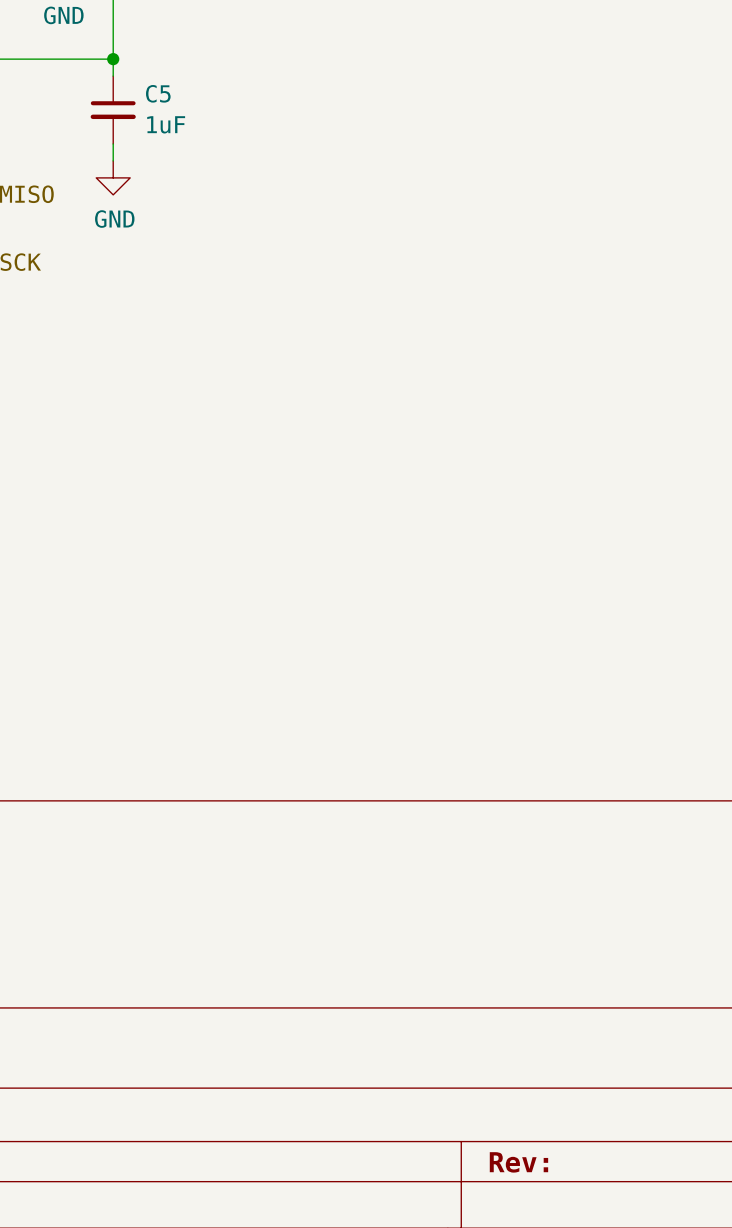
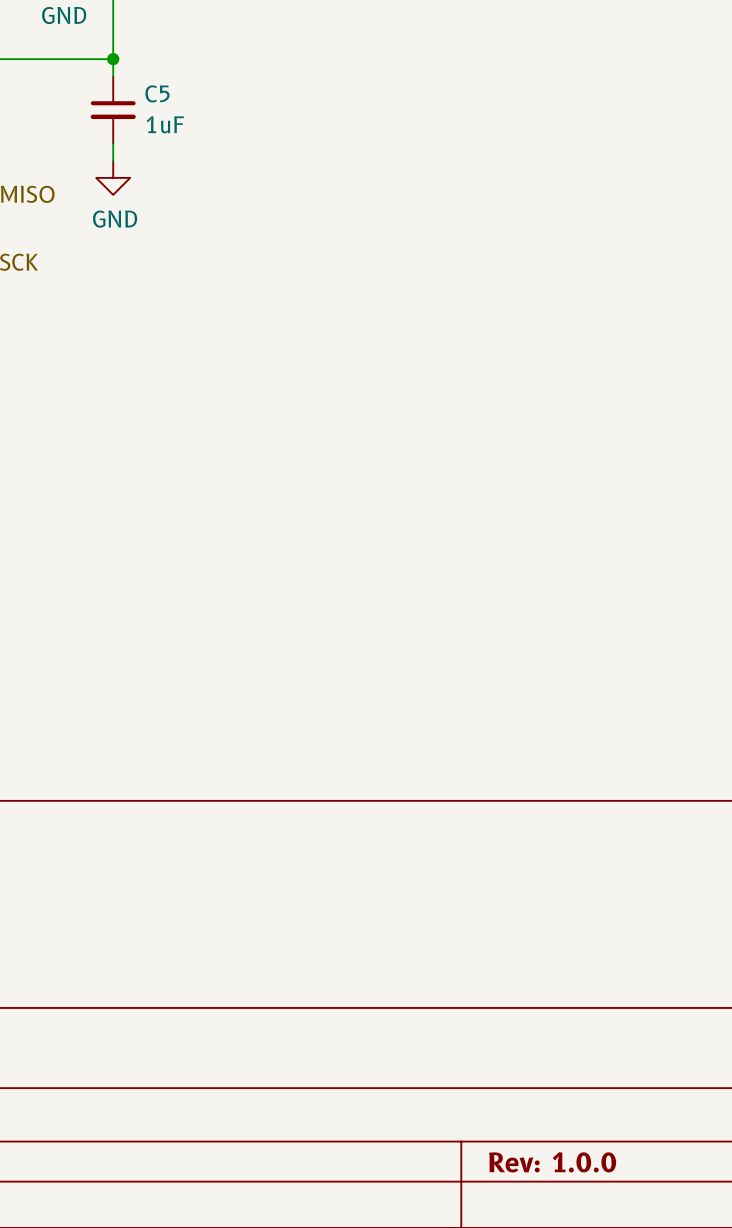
title block: Rev: (518, 1162) -> Rev: 1.0.0 (552, 1162)

